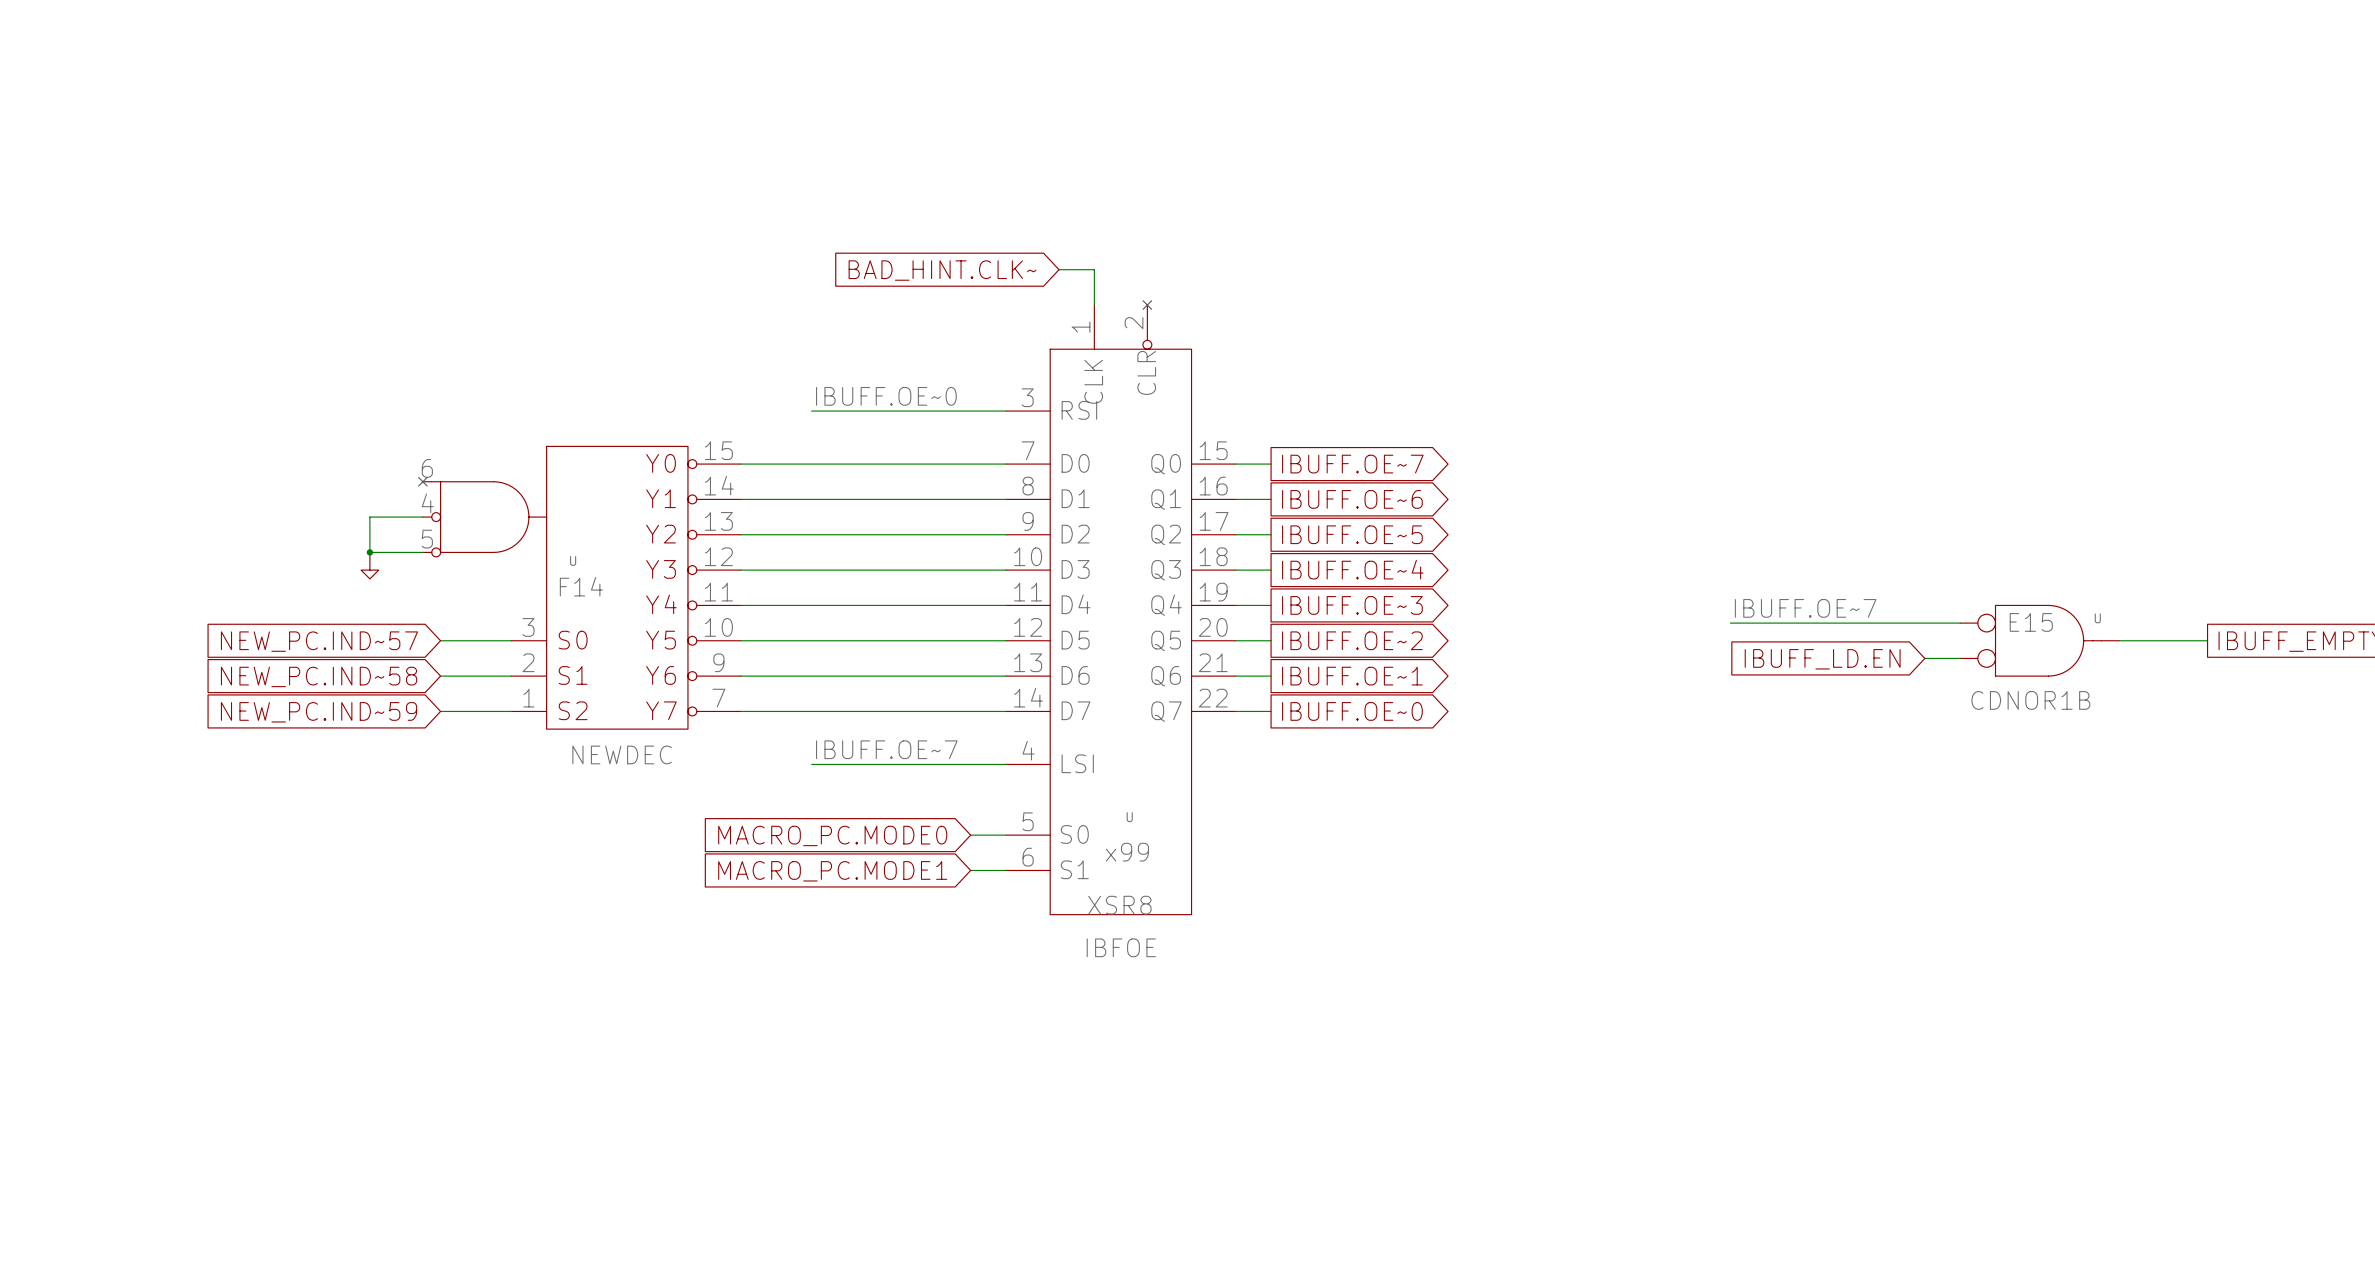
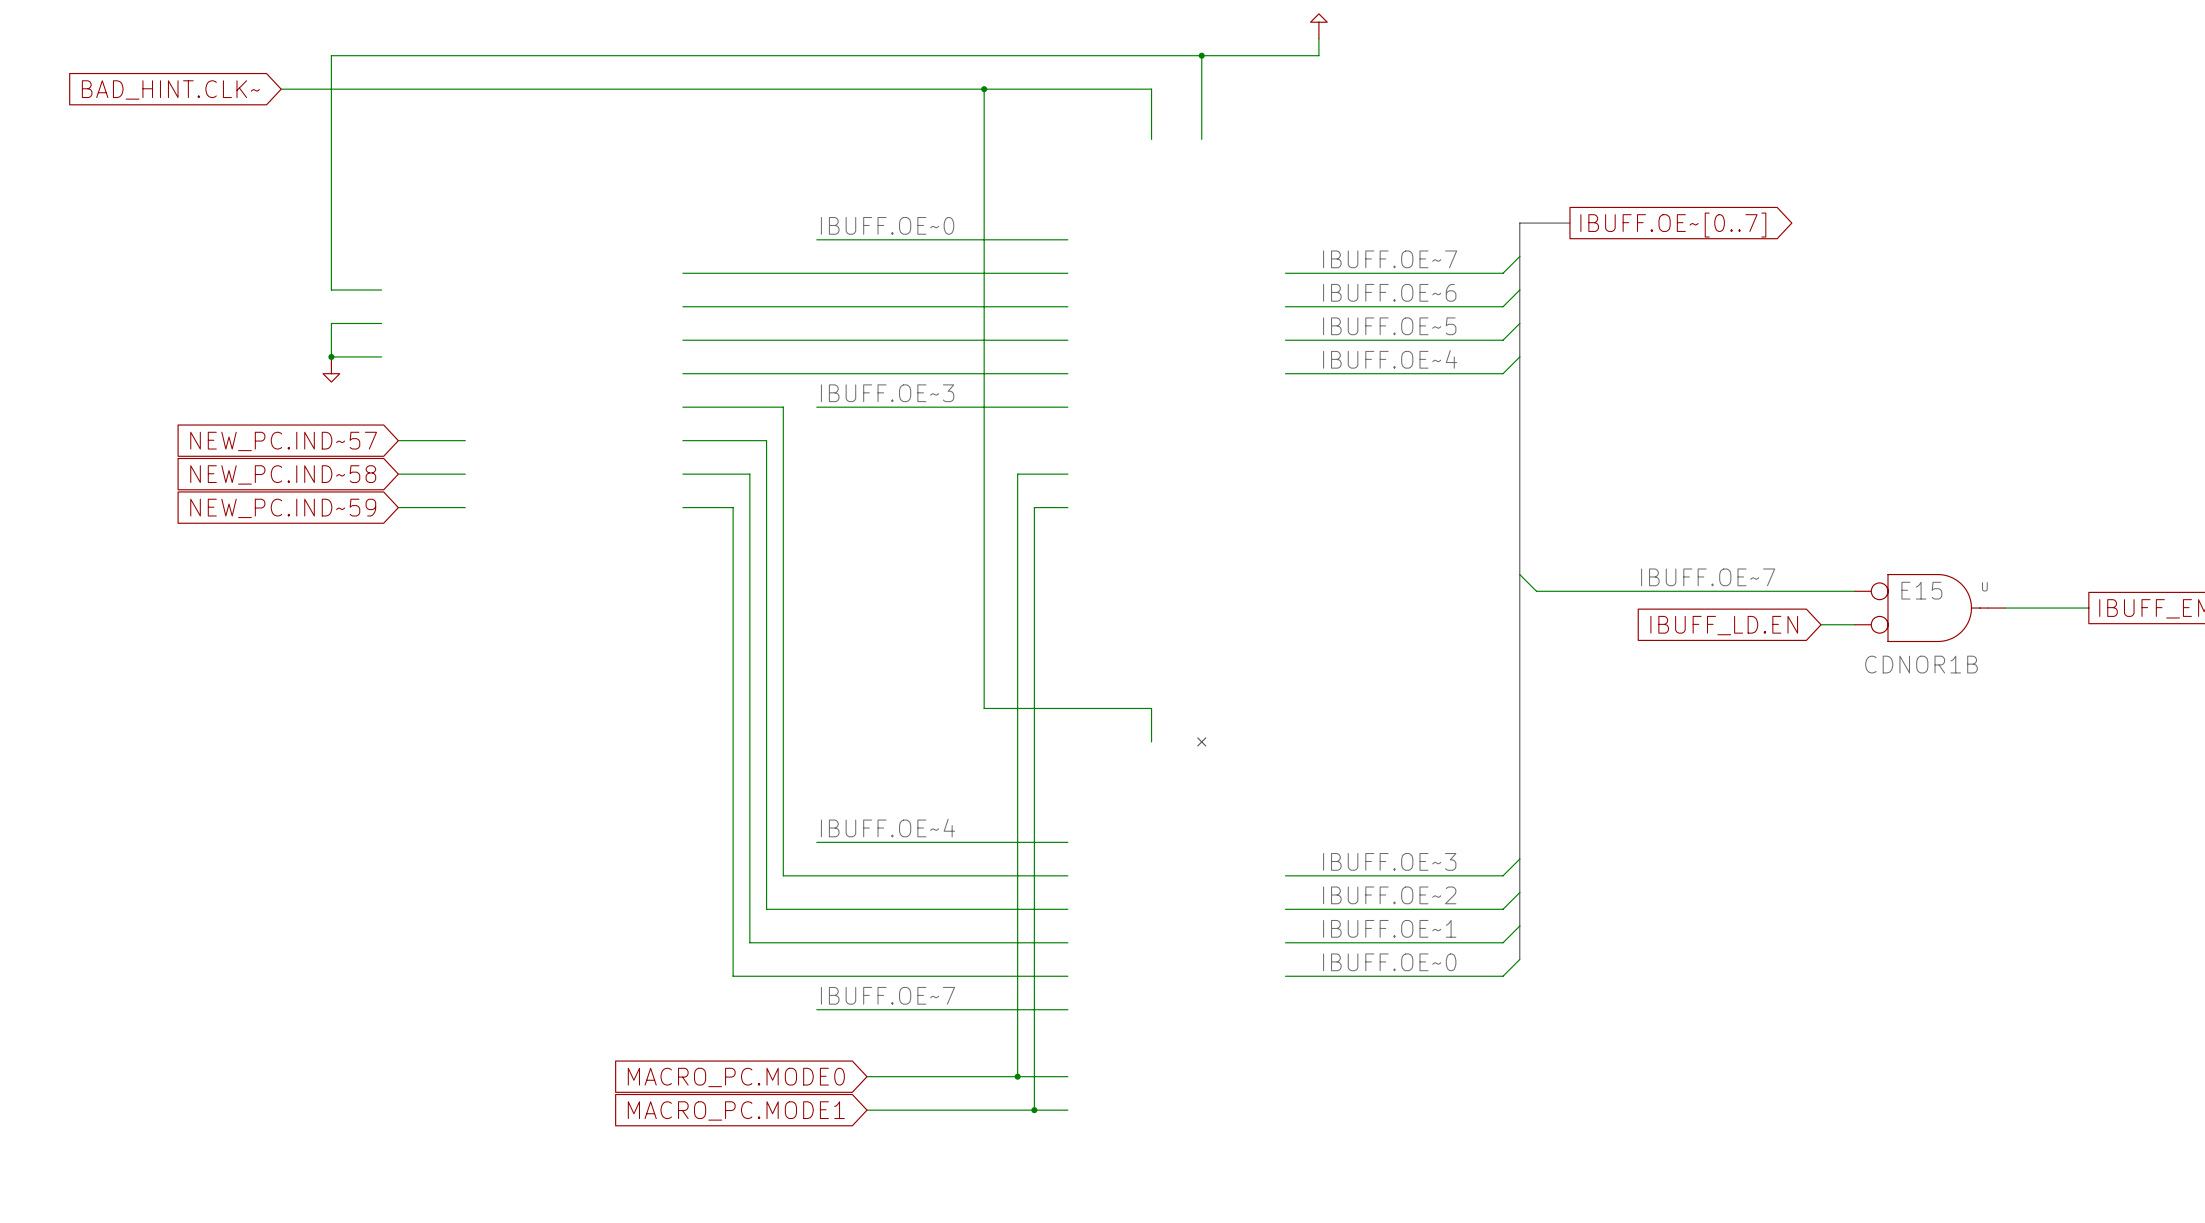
power symbol: none -> (1318, 26)
wire: none -> (1318, 38) (1318, 55) (331, 55) (331, 290) (381, 290)
wire: none -> (1201, 55) (1201, 139)
junction: none -> (1201, 55)
global label: none -> BAD_HINT.CLK~ (170, 89)
wire: none -> (281, 89) (1151, 89) (1151, 139)
wire: none -> (984, 89) (984, 708) (1151, 708) (1151, 741)
junction: none -> (984, 89)
bus: none -> (1569, 223) (1519, 223) (1519, 959)
global label: none -> IBUFF.OE~[0..7] (1673, 225)
wire: none -> (816, 239) (1067, 239)
wire: (1059, 269) (1094, 269) (1094, 305) -> none
wire: none -> (1519, 256) (1503, 273) (1285, 273)
global label: BAD_HINT.CLK~ (942, 270) -> none
label: none -> IBUFF.OE~7 (1390, 259)
wire: none -> (682, 273) (1067, 273)
no-connect mark: (1147, 305) -> none
wire: none -> (1519, 290) (1503, 306) (1285, 306)
label: none -> IBUFF.OE~6 (1389, 292)
wire: none -> (682, 306) (1067, 306)
wire: none -> (381, 323) (331, 323) (331, 356) (381, 356)
wire: none -> (1519, 323) (1503, 340) (1285, 340)
label: none -> IBUFF.OE~5 (1389, 326)
wire: none -> (682, 340) (1067, 340)
junction: none -> (331, 356)
wire: none -> (1519, 356) (1503, 373) (1285, 373)
label: none -> IBUFF.OE~4 (1390, 359)
power symbol: none -> (331, 369)
wire: none -> (682, 373) (1067, 373)
label position: IBUFF.OE~0 (886, 396) -> IBUFF.OE~0 (887, 225)
wire: (811, 411) (1006, 411) -> none
label: none -> IBUFF.OE~3 (887, 393)
wire: none -> (682, 407) (783, 407) (783, 875) (1067, 875)
wire: none -> (816, 407) (1067, 407)
global label: none -> NEW_PC.IND~57 (283, 441)
wire: none -> (398, 440) (465, 440)
wire: (811, 464) (1006, 464) -> (766, 440) (766, 909) (1067, 909)
wire: (1235, 464) (1271, 464) -> none
global label: IBUFF.OE~7 (1352, 464) -> none
no-connect mark: (422, 481) -> none
wire: (793, 499) (1006, 499) -> (749, 474) (749, 942) (1067, 942)
wire: none -> (1067, 474) (1017, 474) (1017, 1076)
wire: (1235, 499) (1271, 499) -> none
global label: IBUFF.OE~6 (1352, 499) -> none
global label: none -> NEW_PC.IND~58 (283, 474)
wire: (422, 517) (369, 517) (369, 552) (422, 552) -> none
wire: (776, 534) (1006, 534) -> (733, 507) (733, 976) (1067, 976)
wire: none -> (1067, 507) (1034, 507) (1034, 1110)
wire: (1235, 534) (1271, 534) -> none
global label: IBUFF.OE~5 (1352, 534) -> none
global label: none -> NEW_PC.IND~59 (283, 508)
junction: (369, 552) -> none
power symbol: (369, 565) -> none
global label: IBUFF.OE~4 (1352, 569) -> none
wire: (740, 570) (1006, 570) -> none
wire: (1235, 570) (1271, 570) -> none
U: (581, 587) -> none
wire: (740, 605) (1006, 605) -> none
wire: (1235, 605) (1271, 605) -> none
global label: IBUFF.OE~3 (1352, 605) -> none
wire: none -> (1519, 574) (1536, 591) (1636, 591)
U: XSR8 (1120, 609) -> none
wire: (440, 640) (511, 640) -> (398, 474) (465, 474)
wire: (740, 640) (1006, 640) -> none
wire: (1235, 640) (1271, 640) -> none
global label: IBUFF.OE~2 (1352, 640) -> none
global label: NEW_PC.IND~57 (319, 641) -> none
global label: NEW_PC.IND~58 (319, 676) -> none
wire: (440, 676) (511, 676) -> (398, 507) (465, 507)
wire: (740, 676) (1006, 676) -> none
wire: (1235, 676) (1271, 676) -> none
global label: IBUFF.OE~1 (1352, 676) -> none
wire: (440, 711) (511, 711) -> none
wire: (740, 711) (1006, 711) -> none
wire: (1235, 711) (1271, 711) -> none
global label: IBUFF.OE~0 (1352, 711) -> none
global label: NEW_PC.IND~59 (319, 712) -> none
label: IBUFF.OE~7 (886, 749) -> none
wire: (811, 764) (1006, 764) -> none
no-connect mark: none -> (1201, 741)
global label: MACRO_PC.MODE0 (832, 835) -> none
wire: (970, 835) (1006, 835) -> none
wire: (970, 870) (1006, 870) -> none
global label: MACRO_PC.MODE1 (832, 871) -> none
label: none -> IBUFF.OE~4 (887, 828)
wire: none -> (816, 842) (1067, 842)
wire: none -> (1519, 859) (1503, 875) (1285, 875)
label: none -> IBUFF.OE~3 (1389, 861)
wire: none -> (1519, 892) (1503, 909) (1285, 909)
label: none -> IBUFF.OE~2 (1389, 895)
wire: none -> (1519, 926) (1503, 942) (1285, 942)
label: none -> IBUFF.OE~1 (1389, 928)
wire: none -> (1519, 959) (1503, 976) (1285, 976)
label: none -> IBUFF.OE~0 (1389, 962)
label: none -> IBUFF.OE~7 (887, 995)
wire: none -> (816, 1009) (1067, 1009)
wire: none -> (867, 1076) (1067, 1076)
junction: none -> (1017, 1076)
global label: none -> MACRO_PC.MODE0 (736, 1077)
wire: none -> (867, 1110) (1067, 1110)
junction: none -> (1034, 1110)
global label: none -> MACRO_PC.MODE1 (736, 1110)

